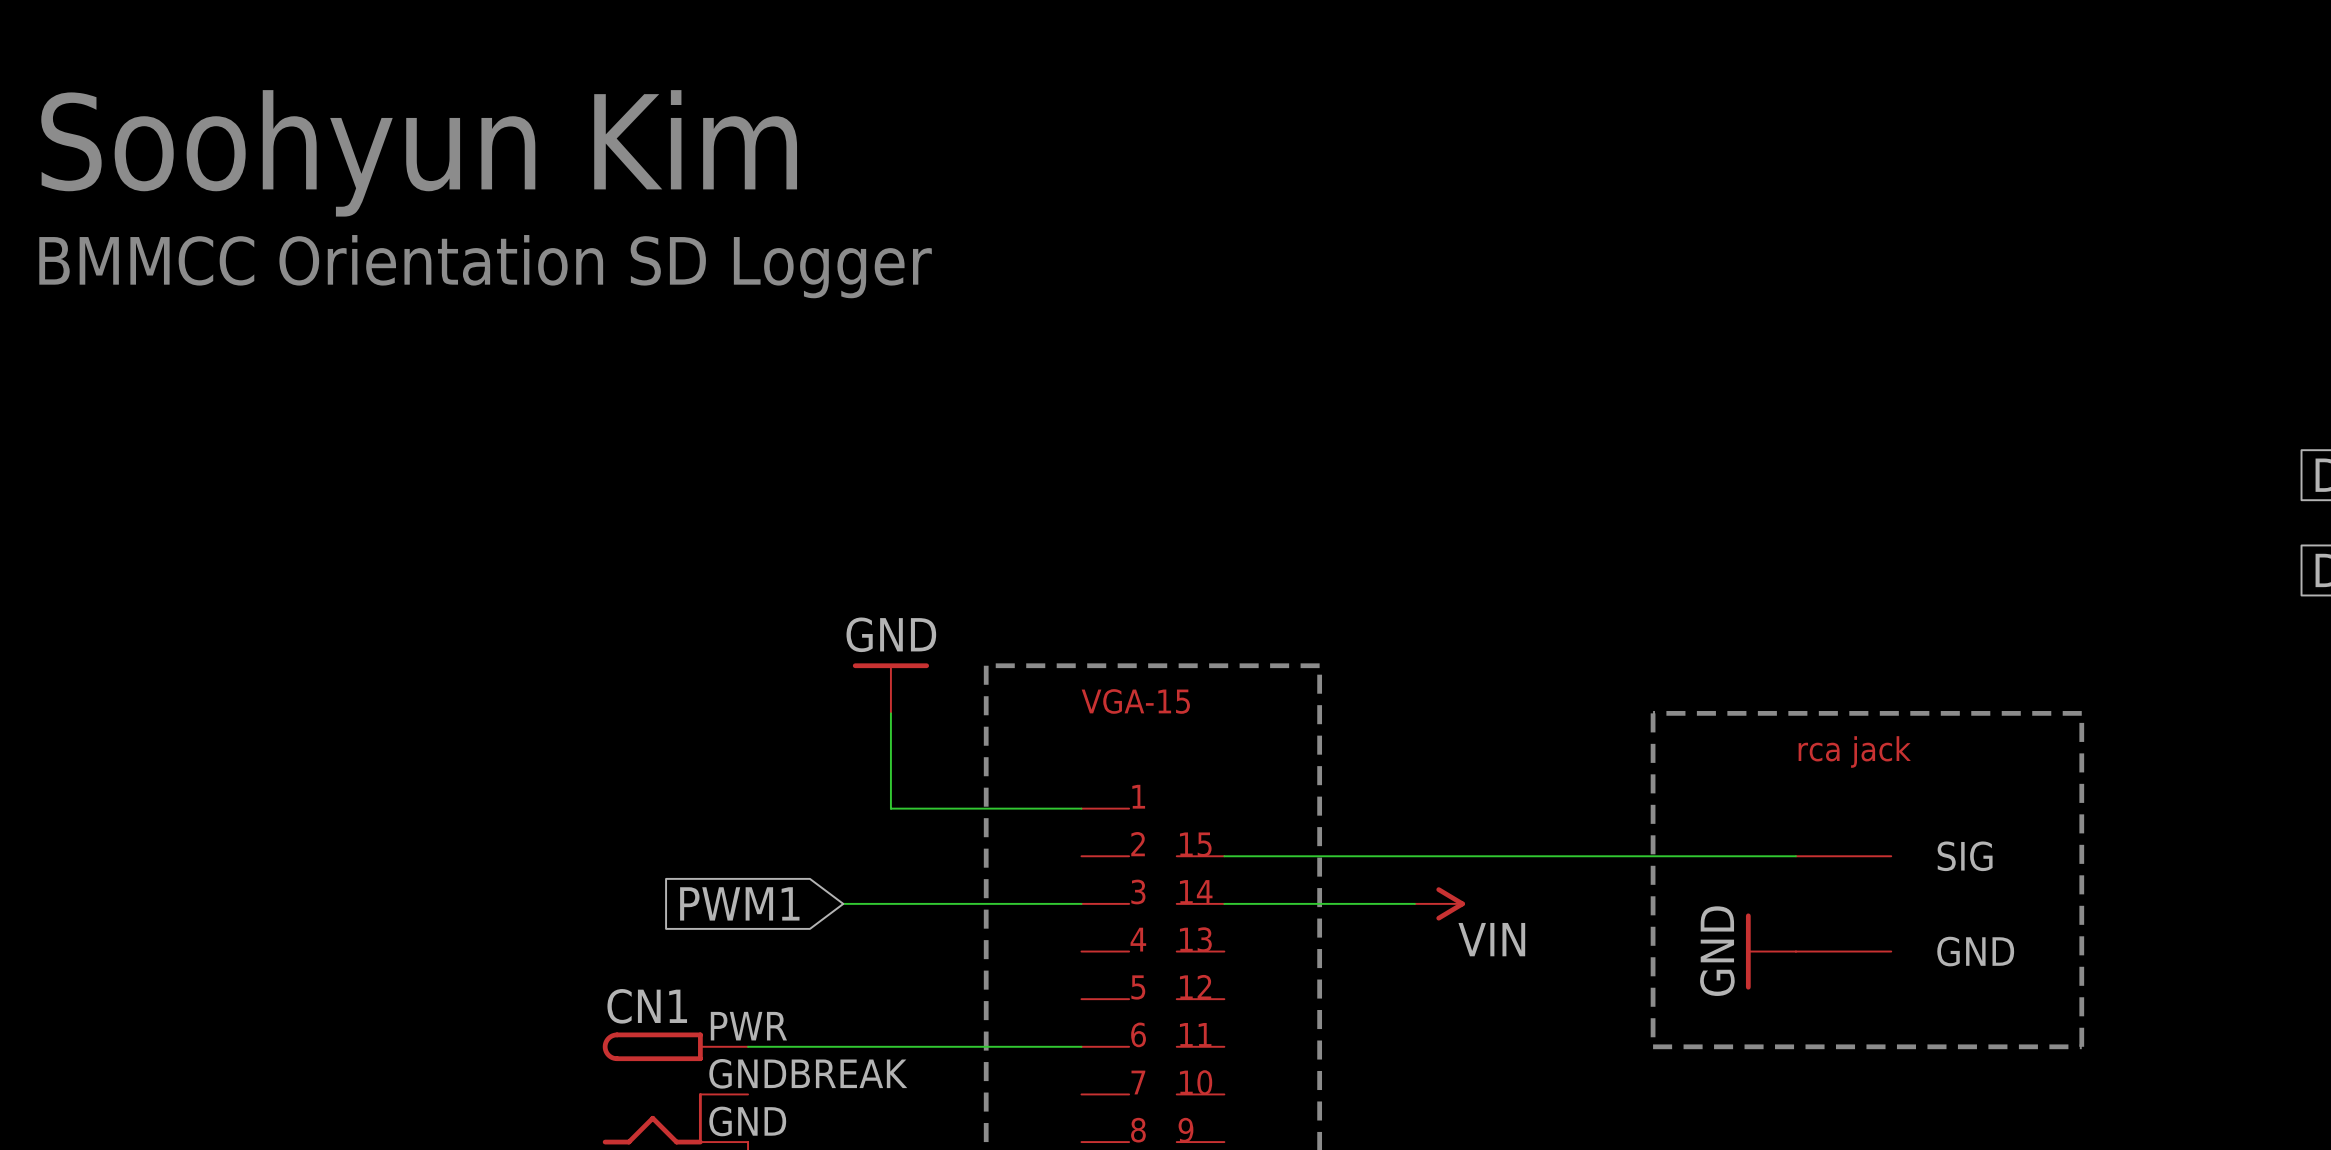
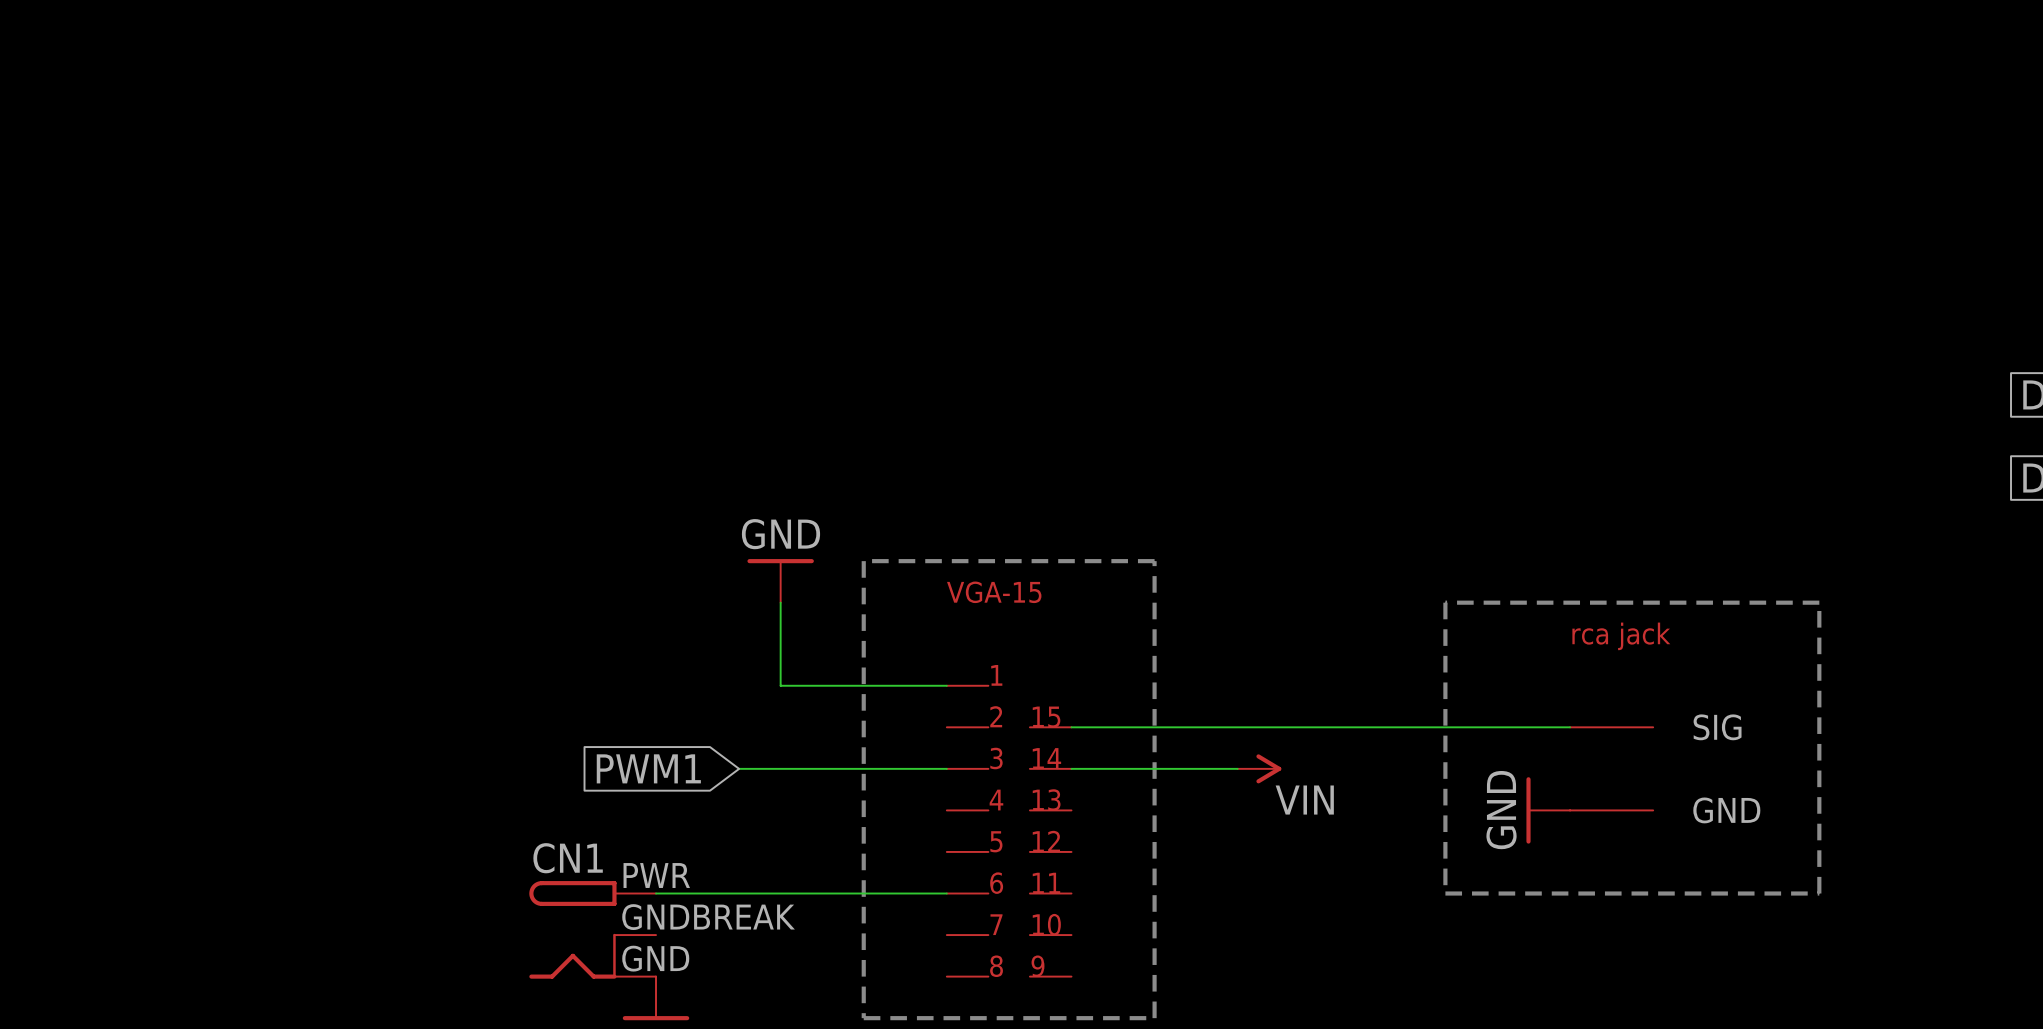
text: Soohyun Kim (419, 153) -> none
text: BMMCC Orientation SD Logger (485, 266) -> none

